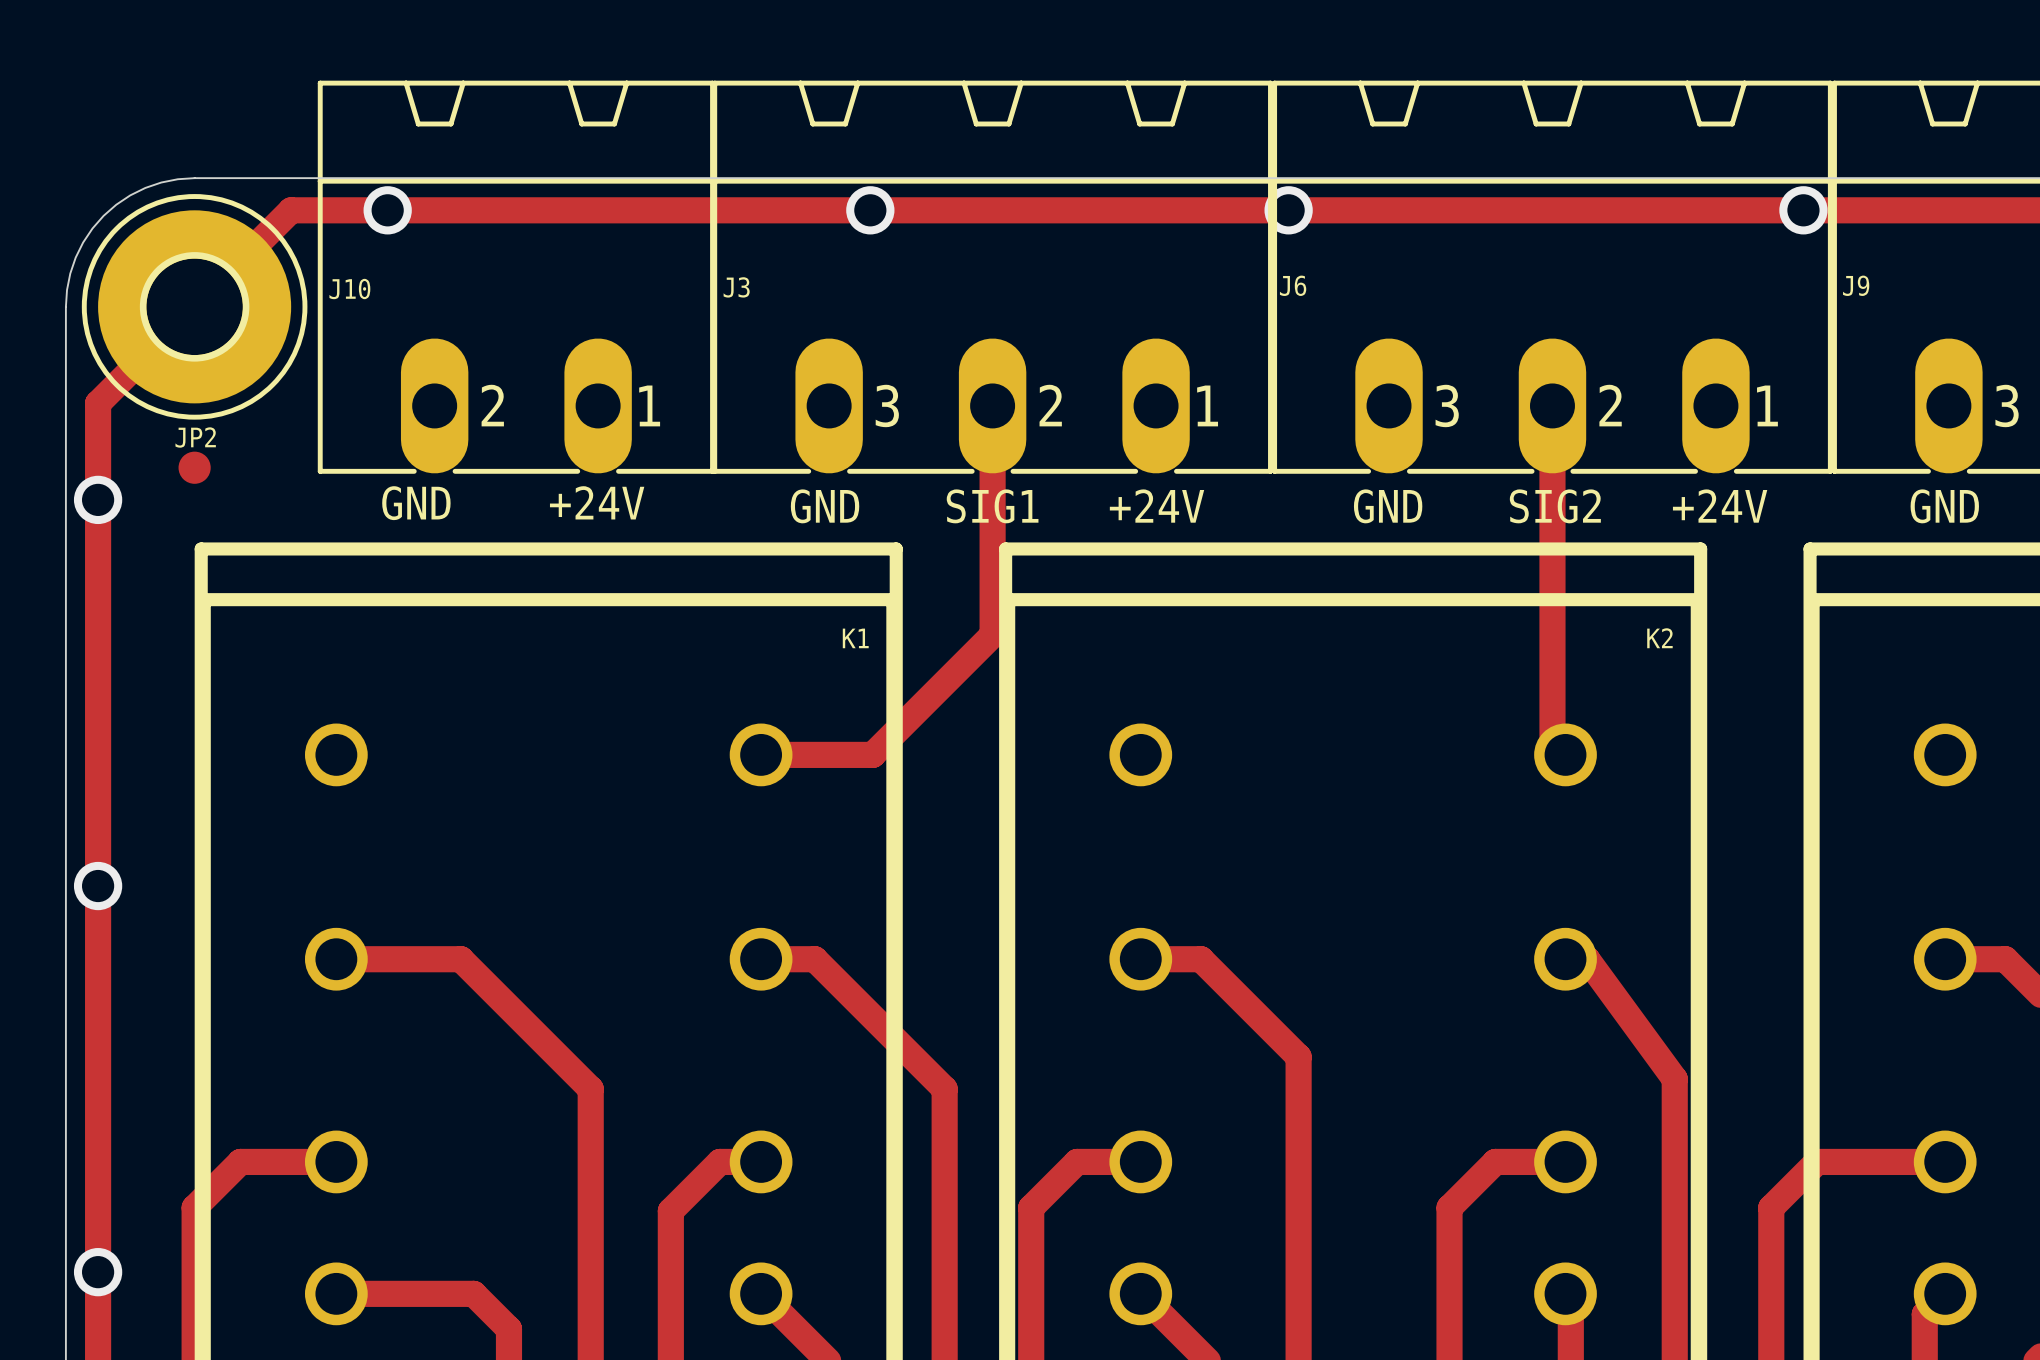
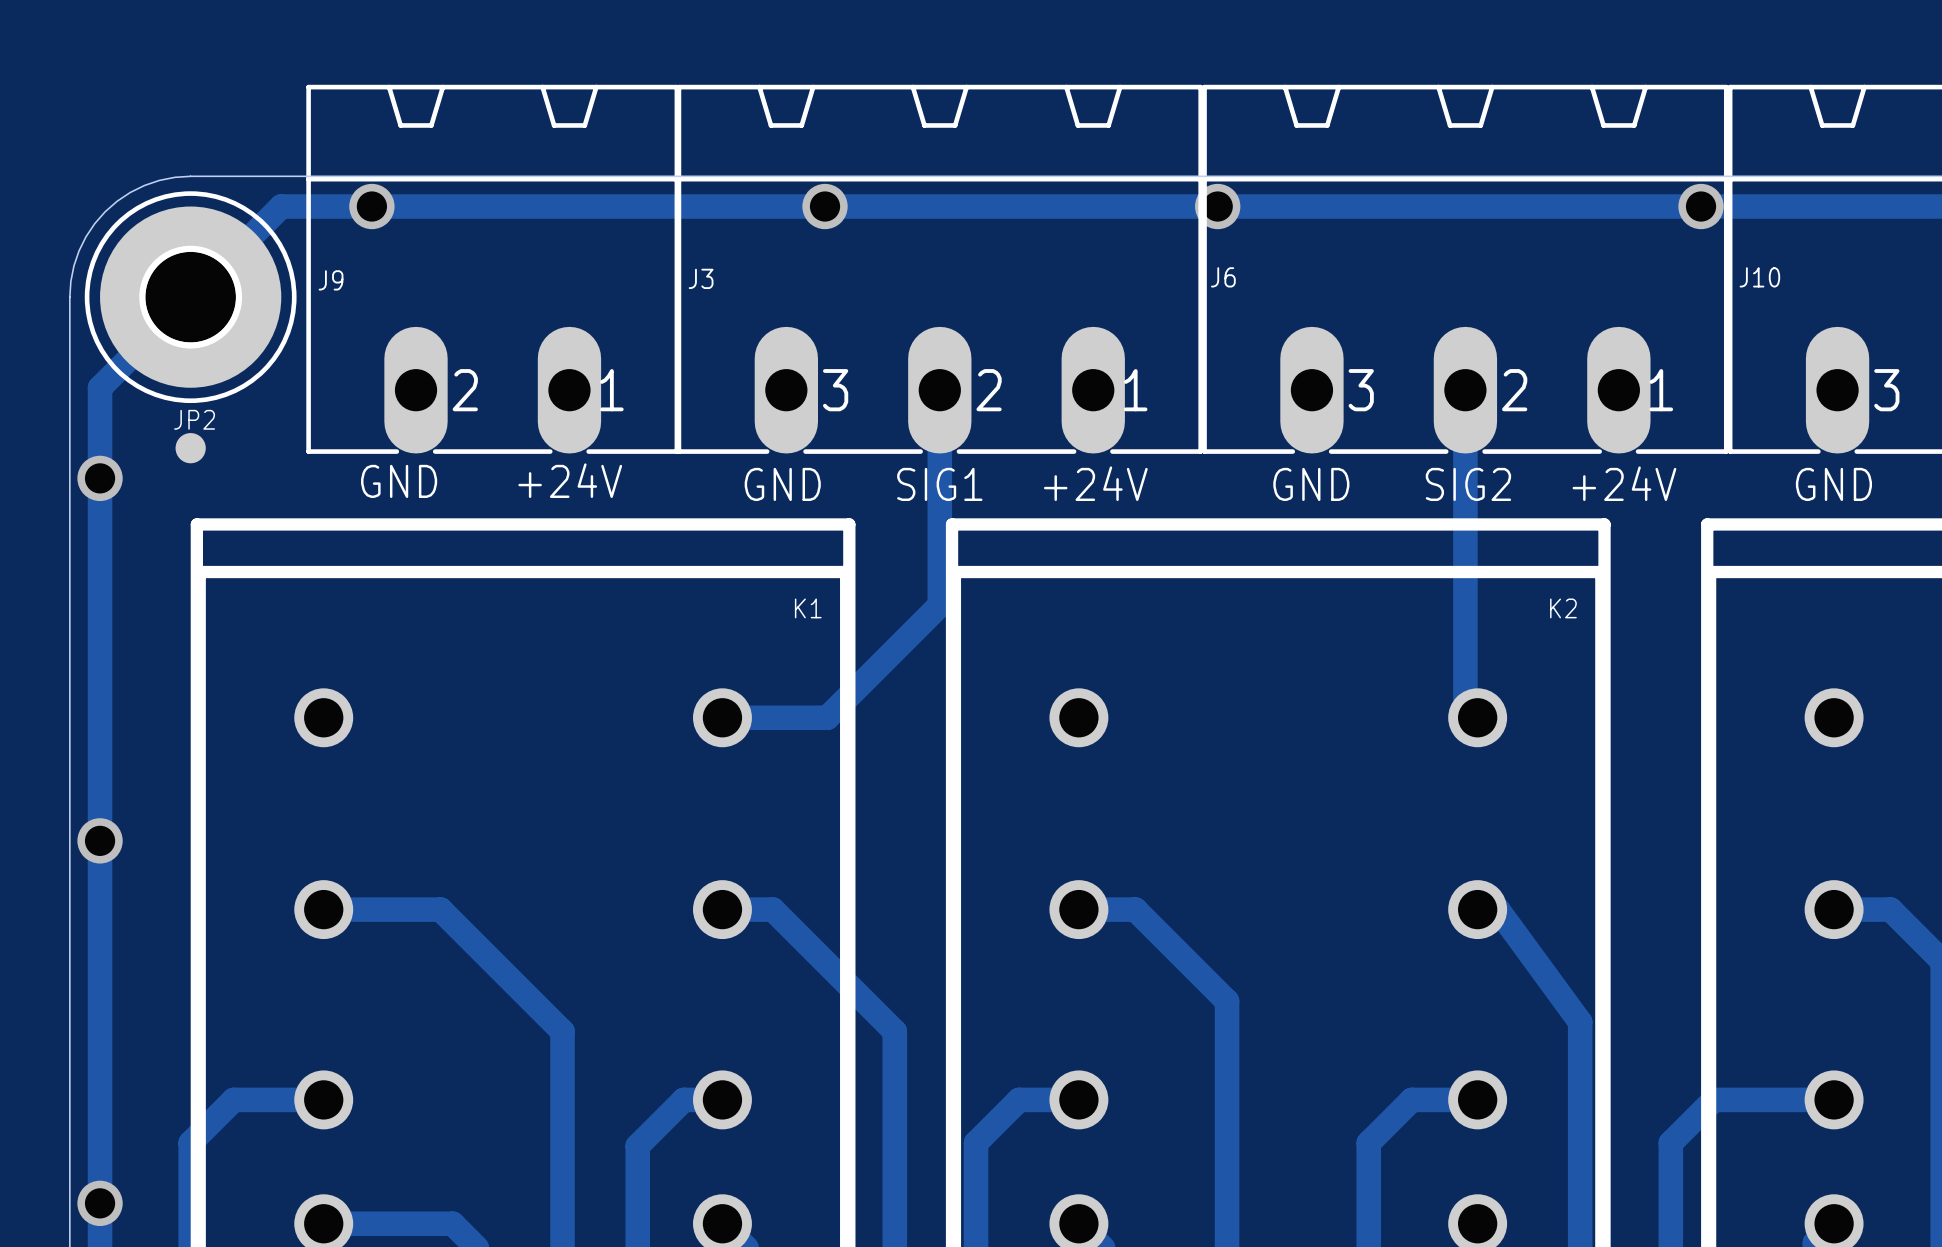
J9 name: J9 (1856, 285) -> J10 (1759, 277)
J10 name: J10 (349, 289) -> J9 (331, 280)

